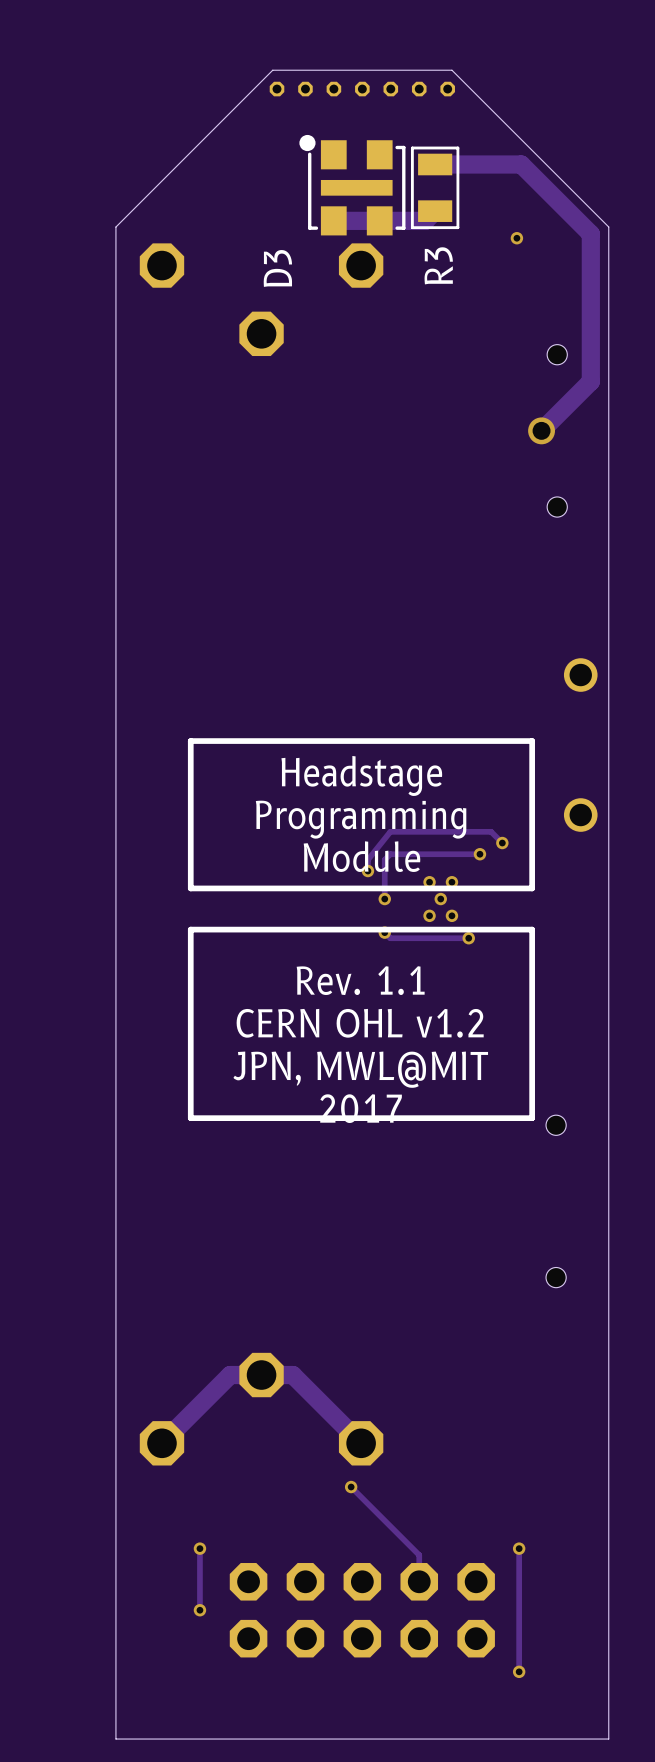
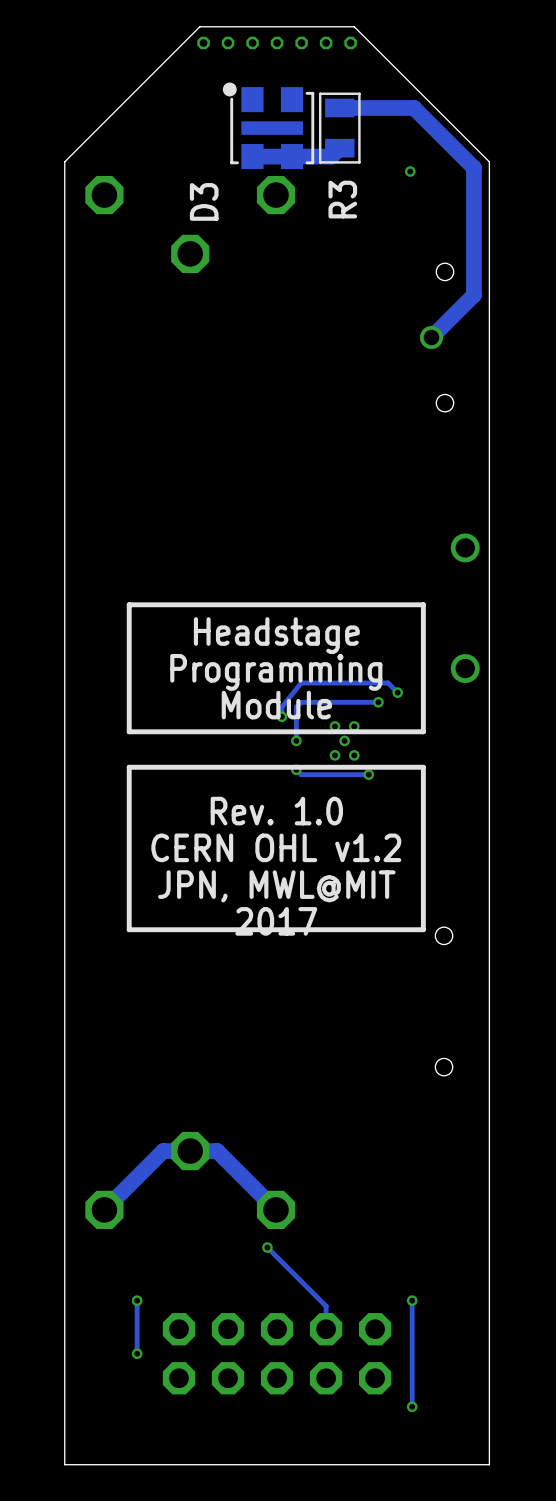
text: Rev. 1.1 (360, 980) -> Rev. 1.0 (276, 811)

